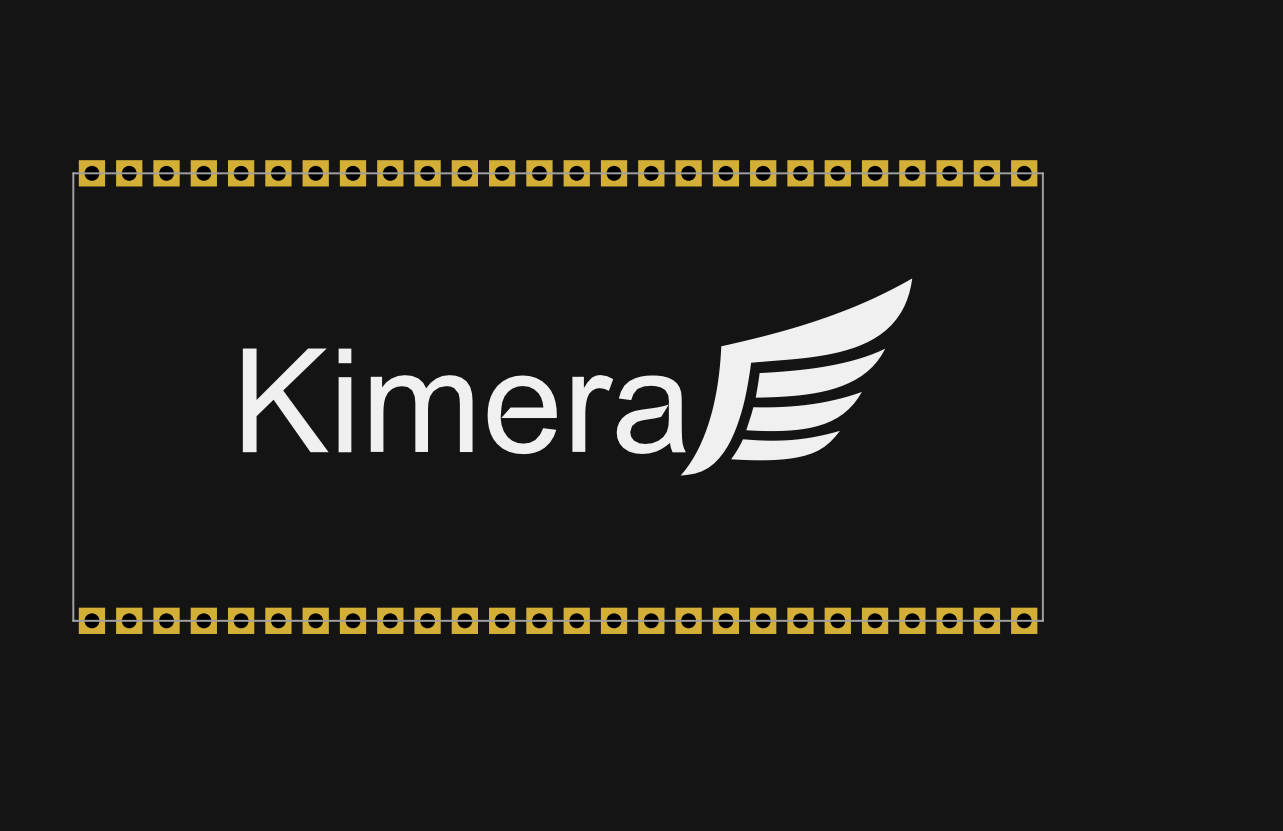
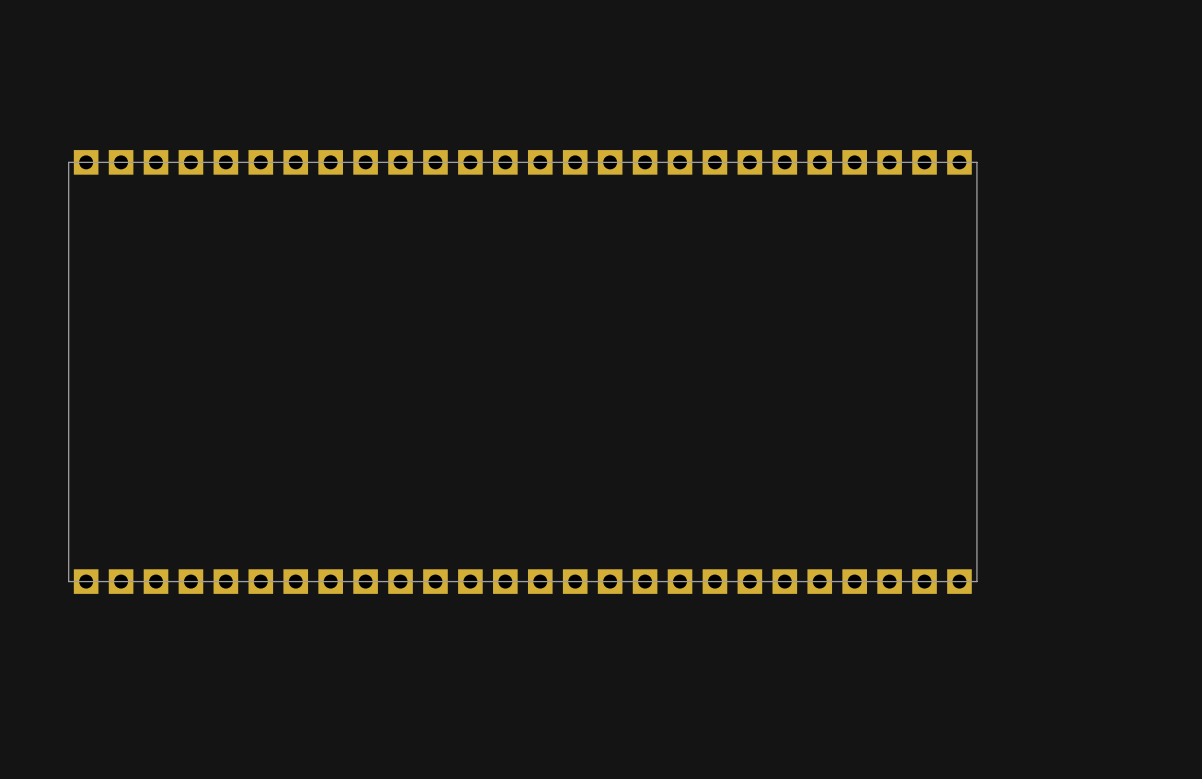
drawing: [242, 278, 913, 476] -> none

